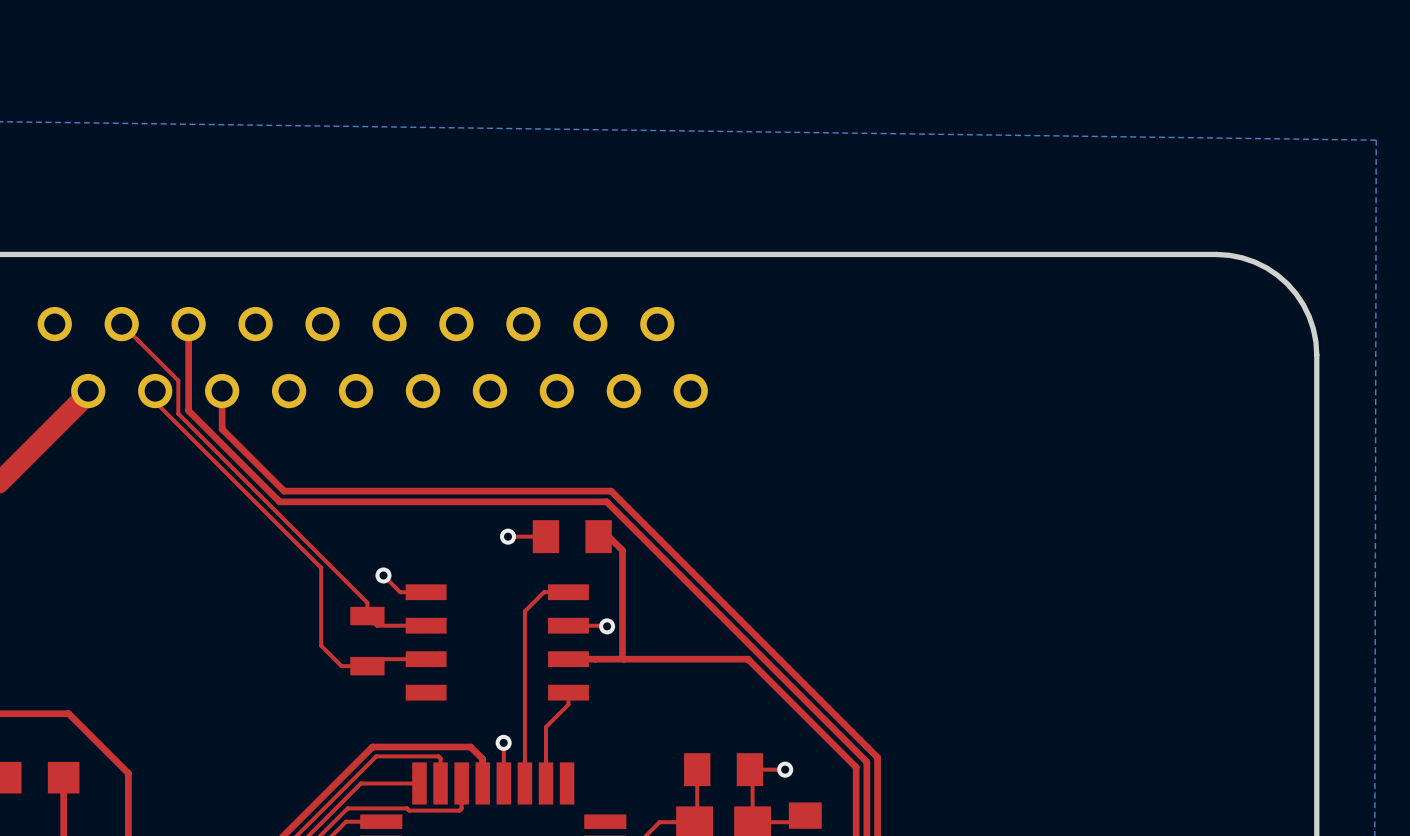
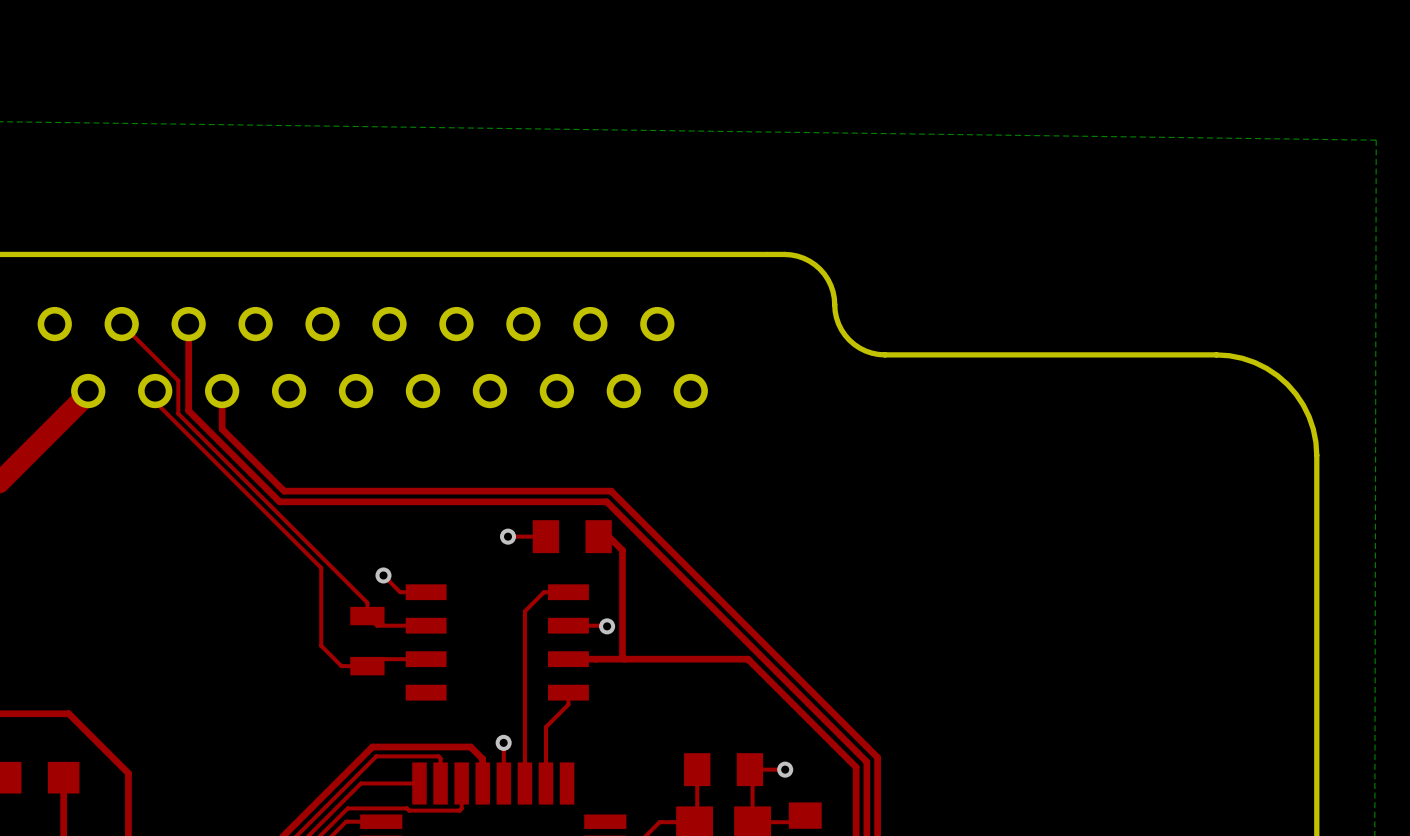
board edge: (784, 254) (1216, 254) (1242, 257) (1254, 262) (1277, 275) (1287, 283) (1303, 304) (1313, 328) (1316, 354) (1316, 455) -> (784, 254) (803, 258) (820, 269) (830, 285) (836, 317) (841, 329) (854, 344) (871, 353) (884, 354) (1216, 354) (1242, 358) (1254, 362) (1277, 375) (1296, 394) (1303, 405) (1313, 429) (1316, 455)

